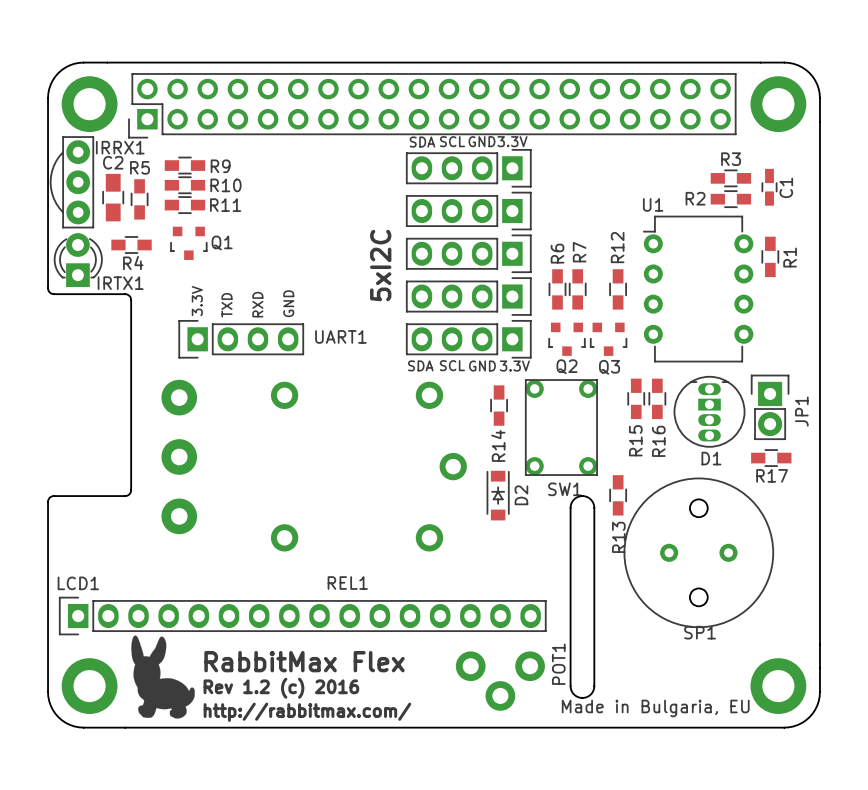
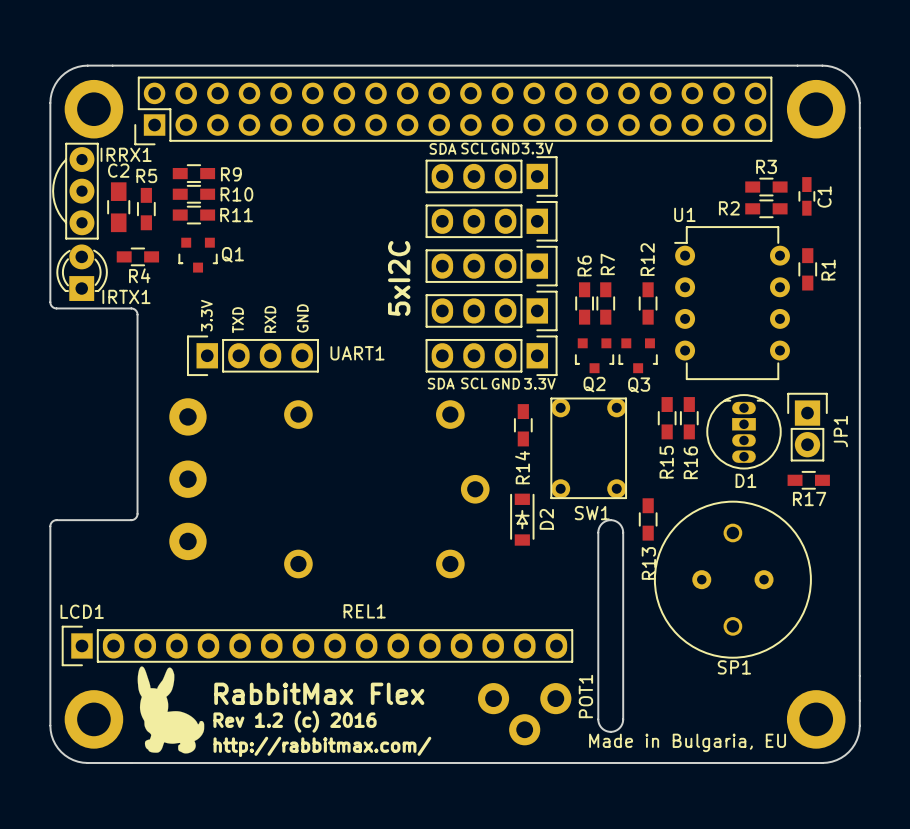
SP1 footprint: [623, 477, 775, 629] -> [653, 500, 812, 659]

